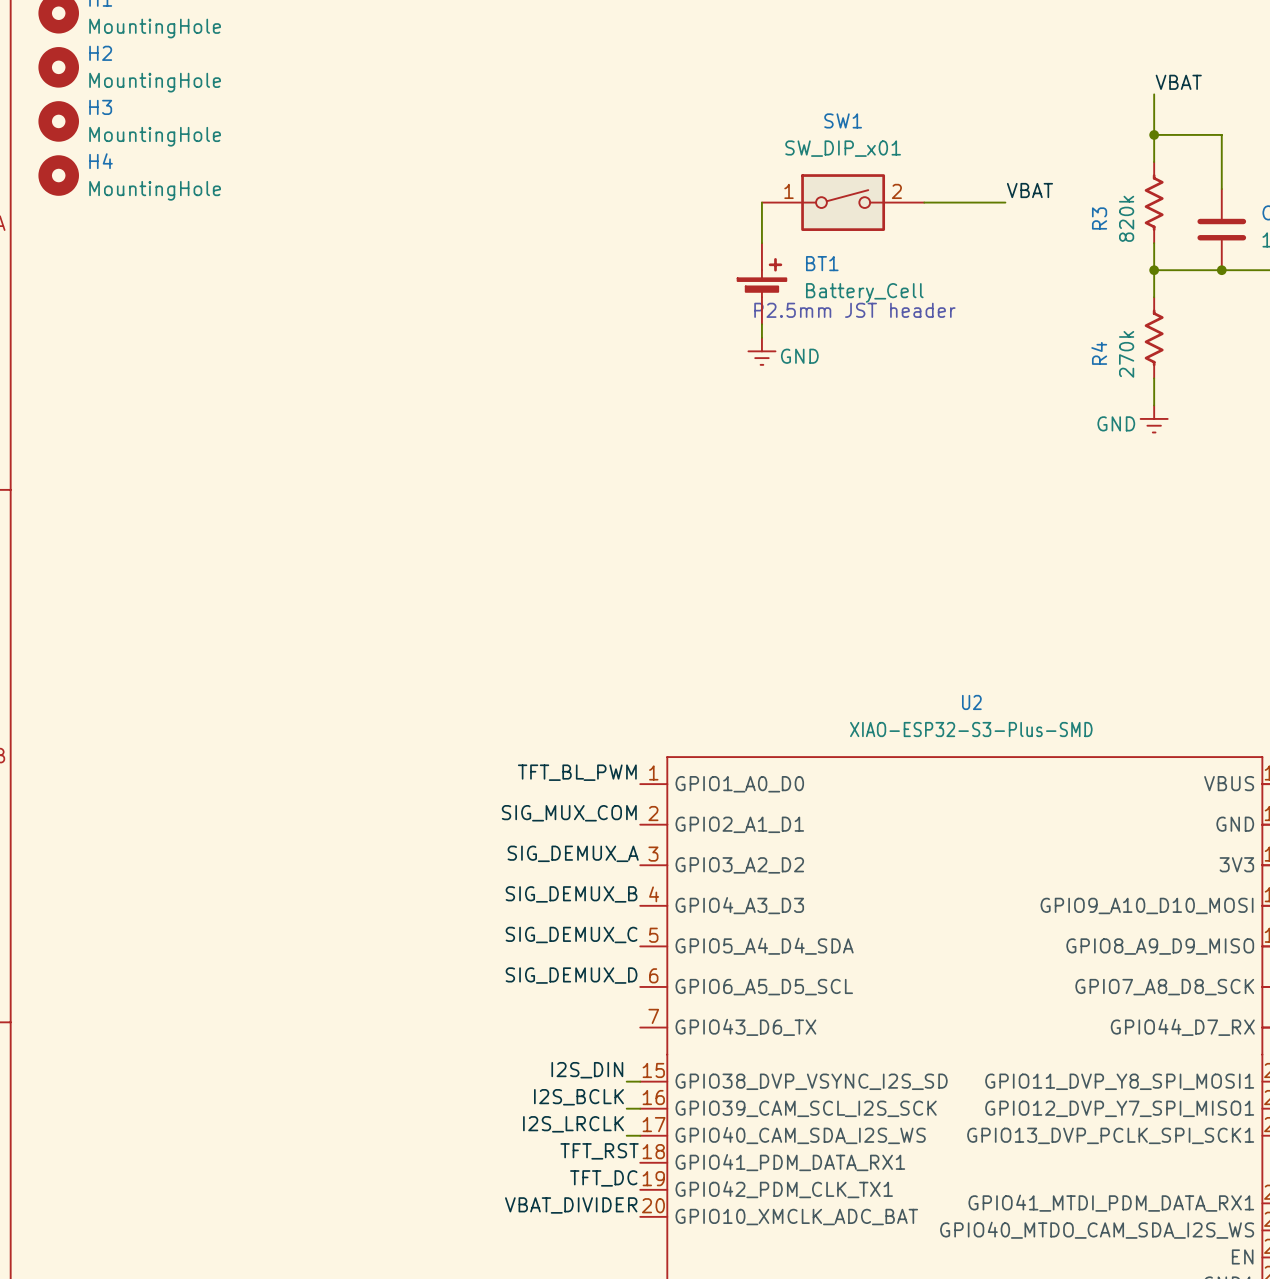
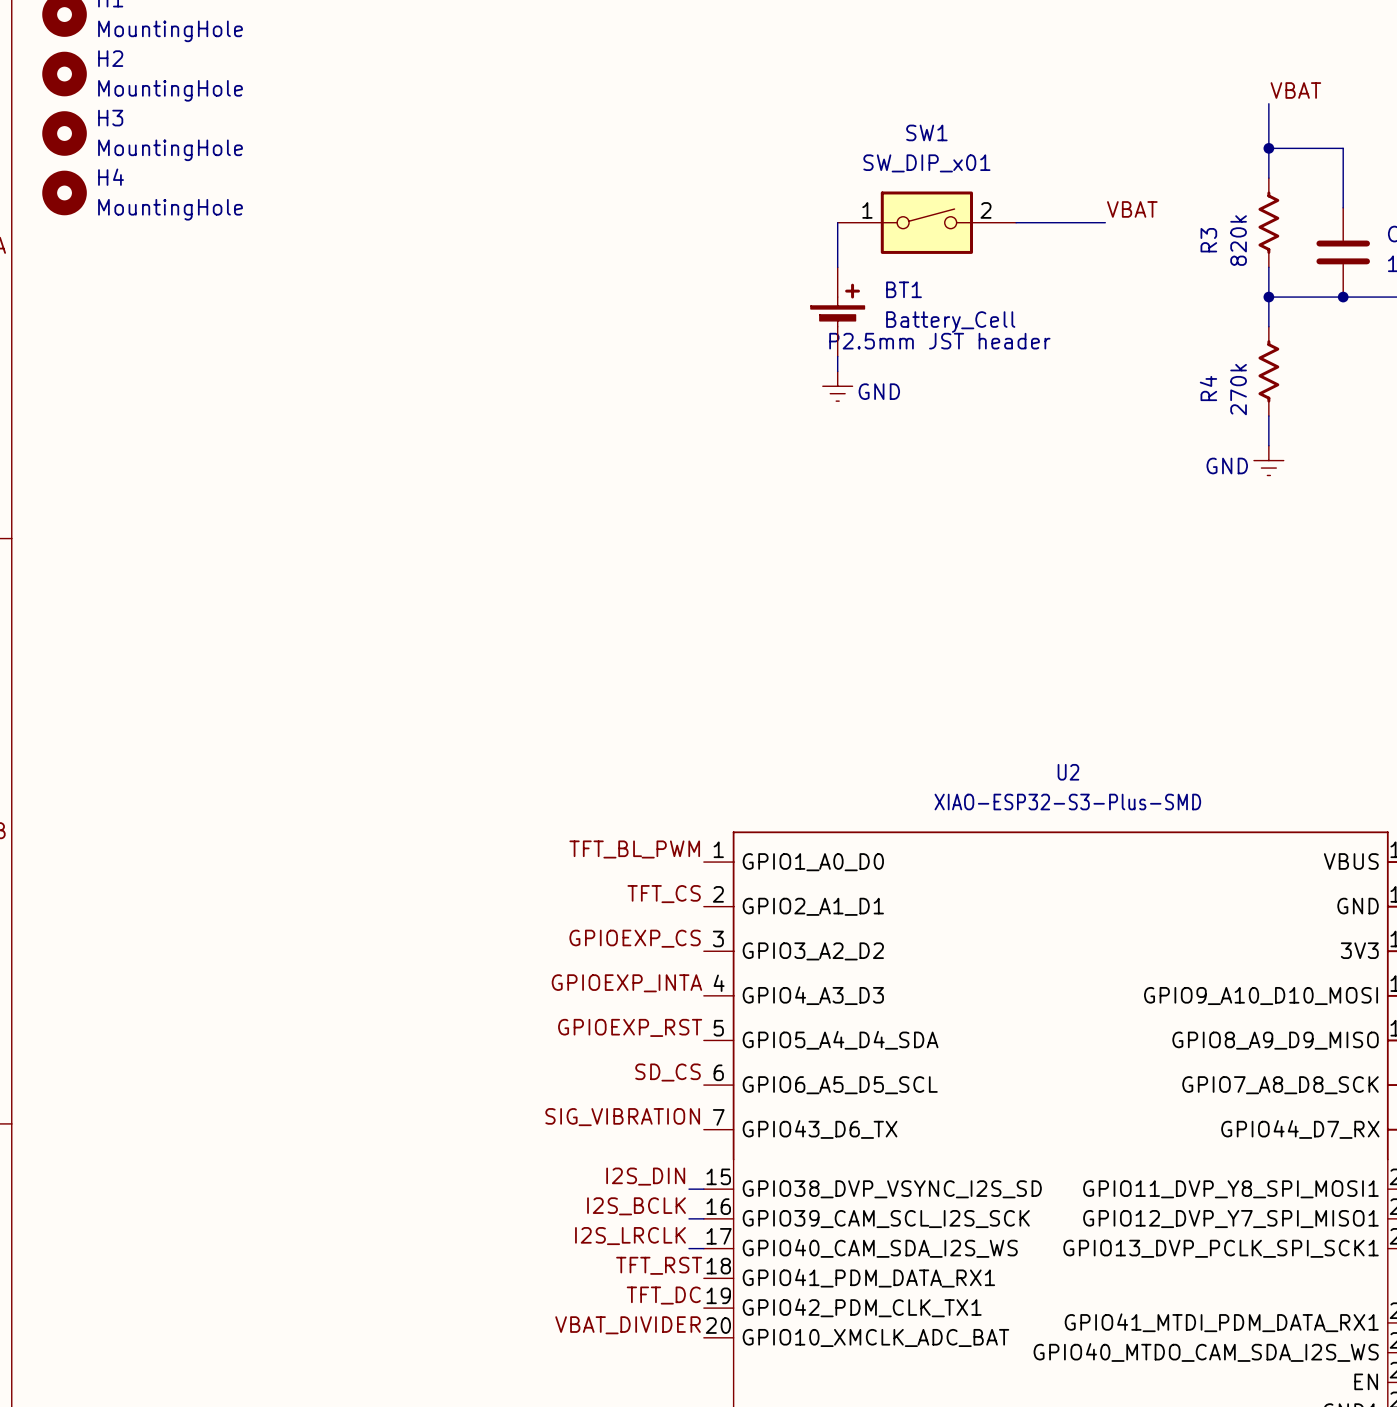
label: SIG_MUX_COM (569, 813) -> TFT_CS (664, 894)
label: SIG_DEMUX_A (573, 853) -> GPIOEXP_CS (635, 938)
label: SIG_DEMUX_B (571, 894) -> GPIOEXP_INTA (626, 983)
label: SIG_DEMUX_C (571, 934) -> GPIOEXP_RST (630, 1027)
label: SIG_DEMUX_D (571, 975) -> SD_CS (668, 1072)
label: none -> SIG_VIBRATION (622, 1117)

